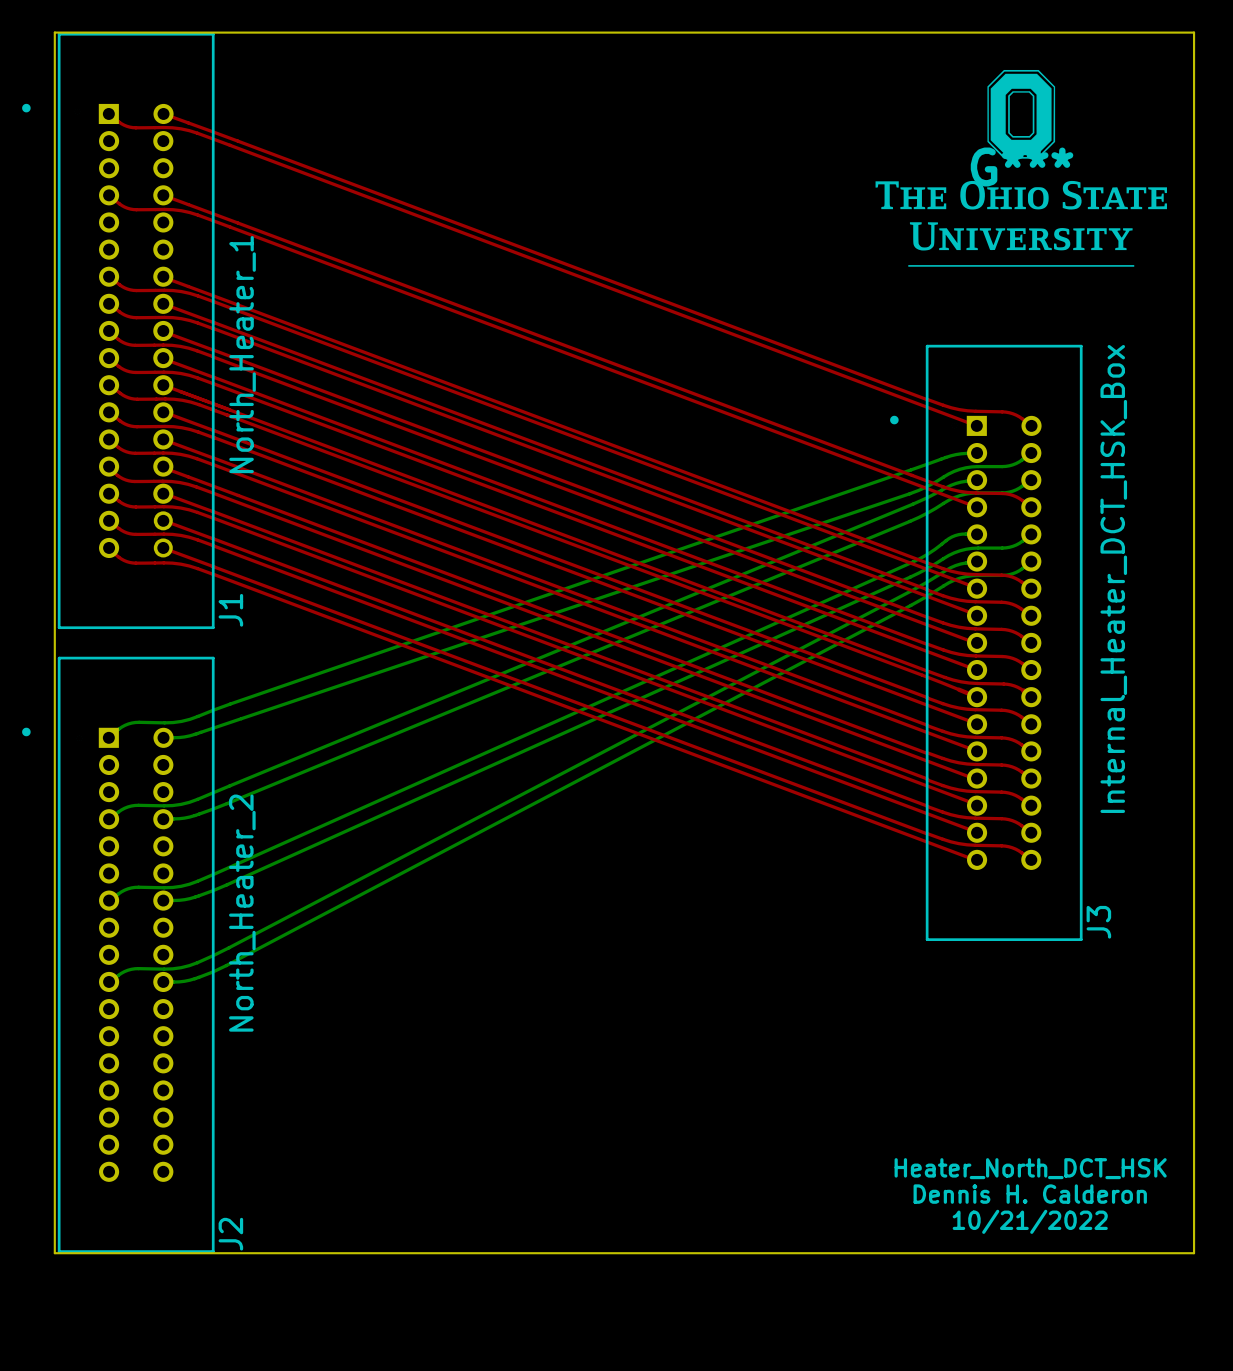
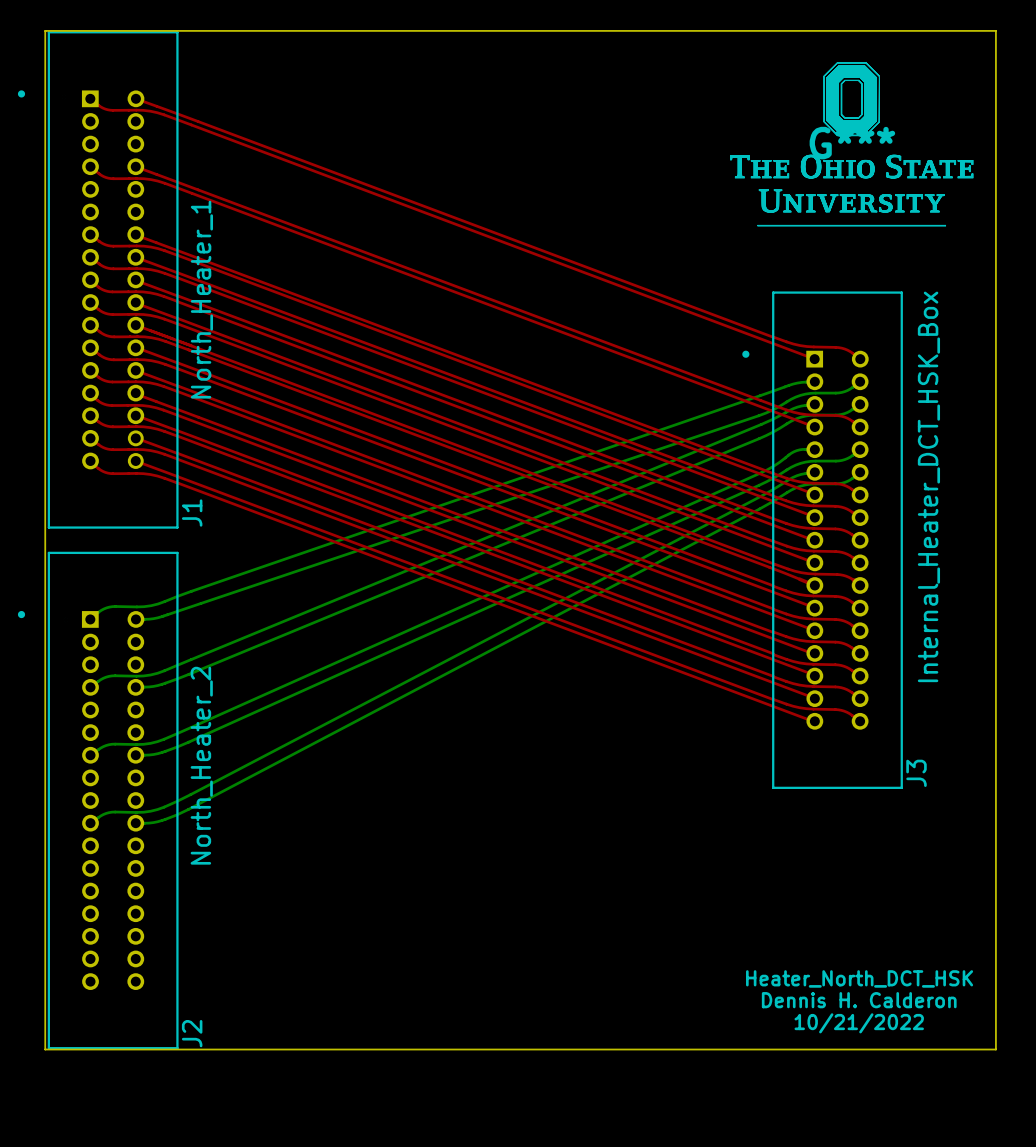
drawing: none -> [730, 62, 974, 227]

